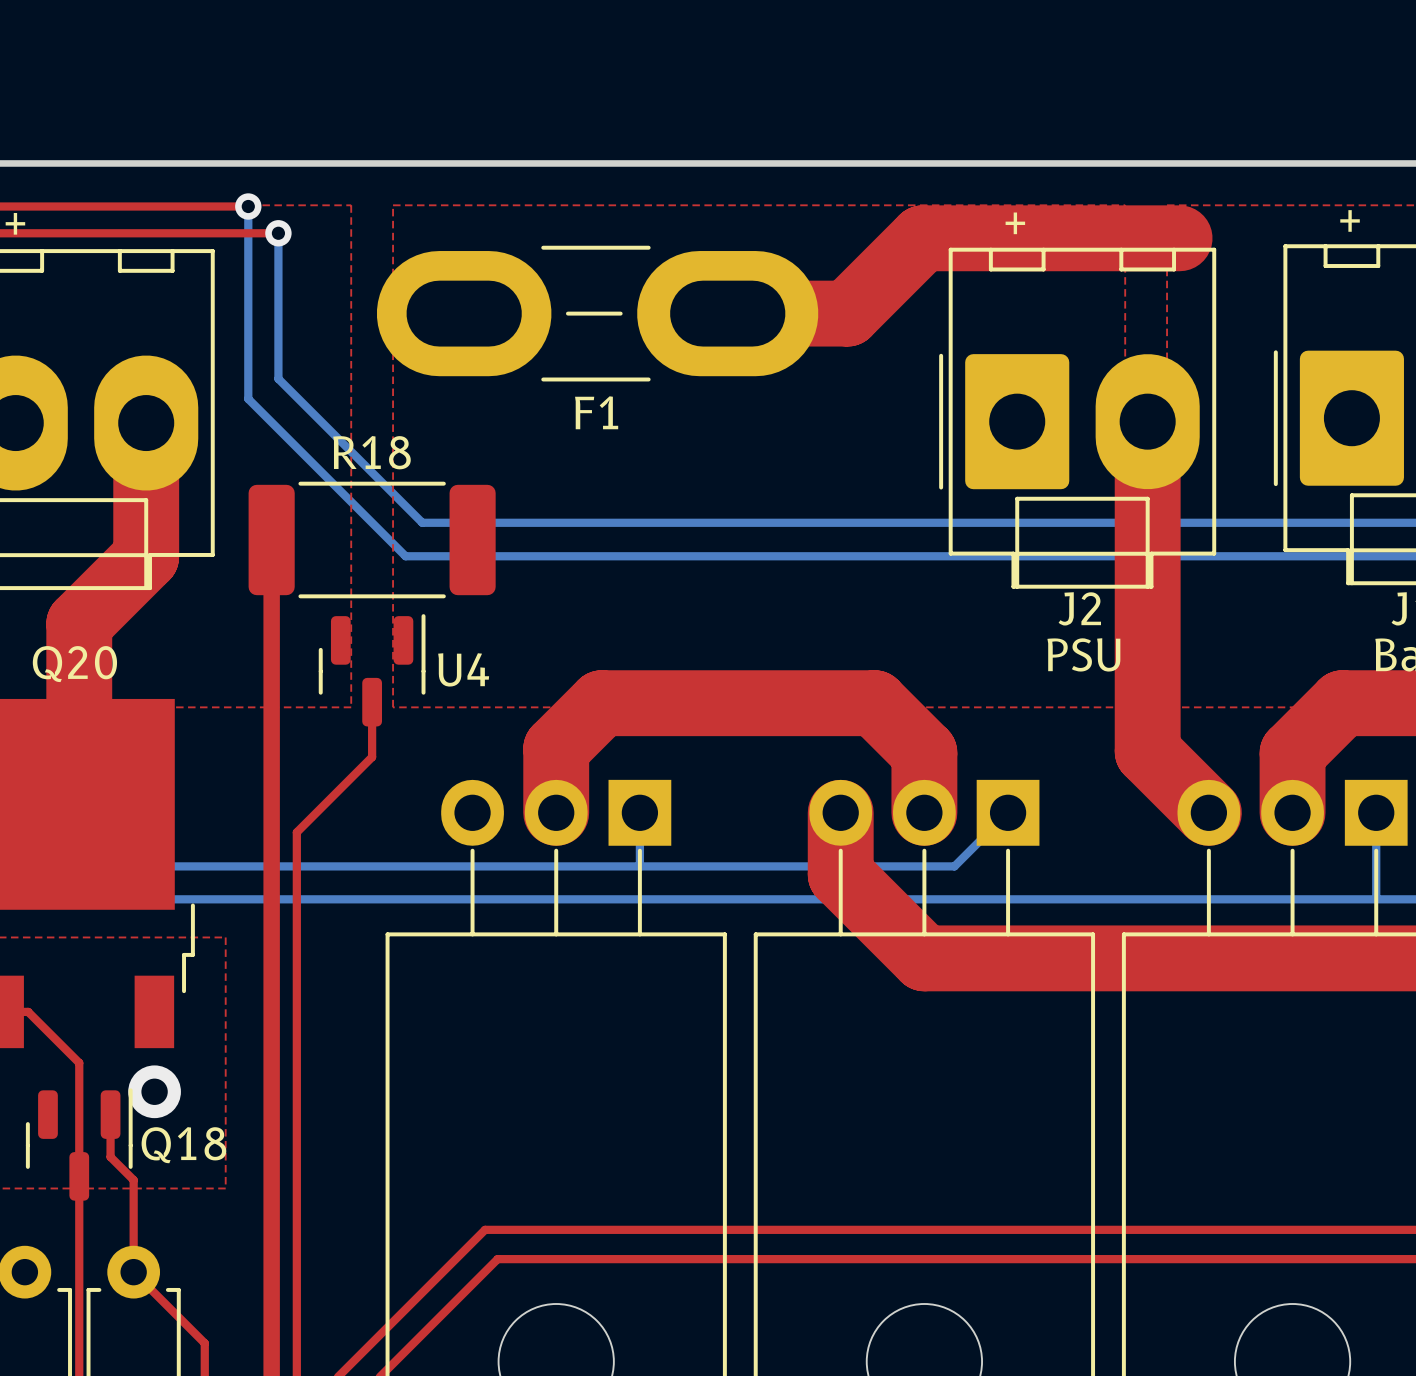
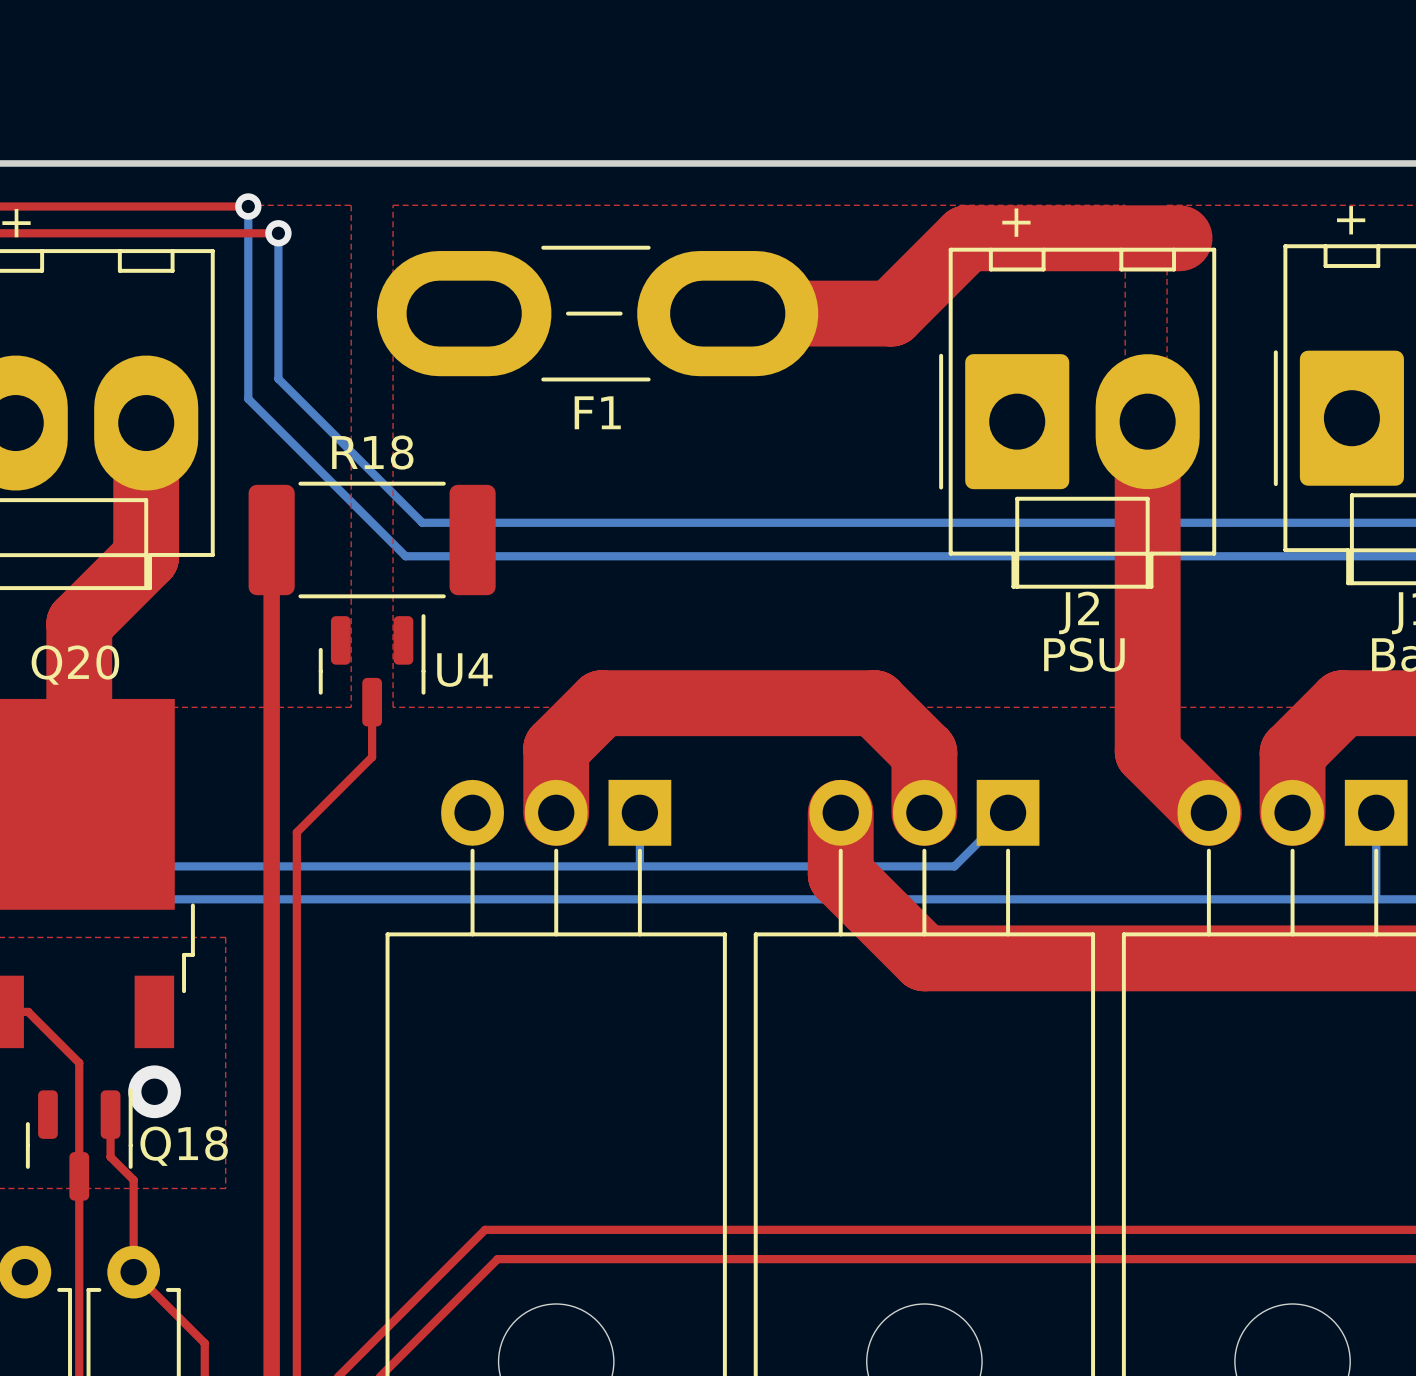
top track: (966, 238) (922, 238) (847, 313) -> (966, 238) (891, 313) (847, 313)

